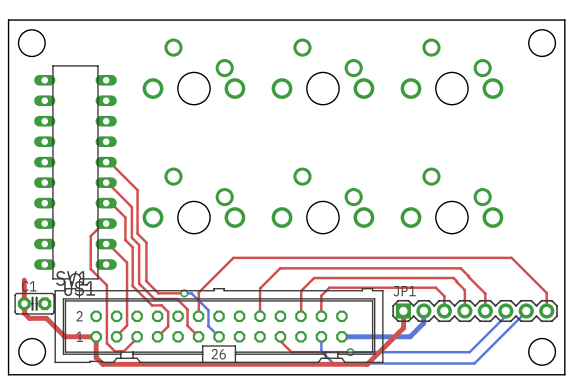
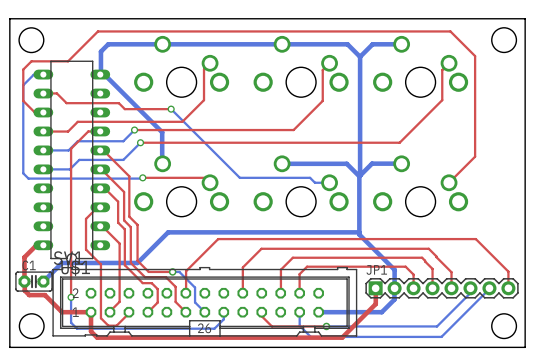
bottom track: none -> (401, 44) (372, 44) (360, 56)
bottom track: none -> (360, 56) (347, 44) (108, 44) (100, 51) (100, 73)
bottom track: none -> (360, 56) (360, 174)
top track: none -> (210, 63) (204, 69) (204, 100) (182, 121) (77, 121) (68, 131) (43, 131)
top track: none -> (329, 63) (322, 70) (322, 100) (293, 130) (134, 130)
top track: none -> (449, 63) (442, 70) (442, 100) (399, 142) (140, 142)
bottom track: none -> (100, 73) (103, 73) (162, 132) (162, 163)
bottom track: none -> (43, 74) (33, 74) (23, 85) (23, 173) (28, 178) (142, 177)
top track: none -> (43, 93) (56, 93) (66, 103) (118, 103) (124, 109) (171, 109)
bottom track: none -> (171, 109) (239, 177) (310, 177) (314, 182) (329, 182)
via: none -> (171, 109)
top track: none -> (43, 112) (34, 112) (23, 100) (23, 69) (31, 61) (68, 61) (97, 31) (450, 31) (475, 56) (475, 156) (449, 182)
bottom track: none -> (134, 130) (123, 141) (77, 141) (68, 150) (43, 150)
via: none -> (134, 130)
top track: none -> (100, 131) (88, 131) (71, 148) (71, 297)
bottom track: none -> (140, 142) (123, 159) (79, 159) (69, 169) (43, 169)
via: none -> (140, 142)
bottom track: none -> (282, 163) (346, 163) (359, 176)
bottom track: none -> (401, 163) (372, 163) (359, 176)
bottom track: none -> (359, 176) (359, 234) (394, 269) (394, 288)
top track: none -> (142, 177) (205, 177) (210, 182)
via: none -> (142, 177)
bottom track: none -> (359, 232) (168, 232) (137, 262) (62, 262) (43, 281)
top track: none -> (43, 245) (35, 245) (24, 257) (24, 259)
bottom track: none -> (71, 297) (71, 322) (77, 328) (214, 328) (223, 319) (223, 312)
via: none -> (71, 297)

